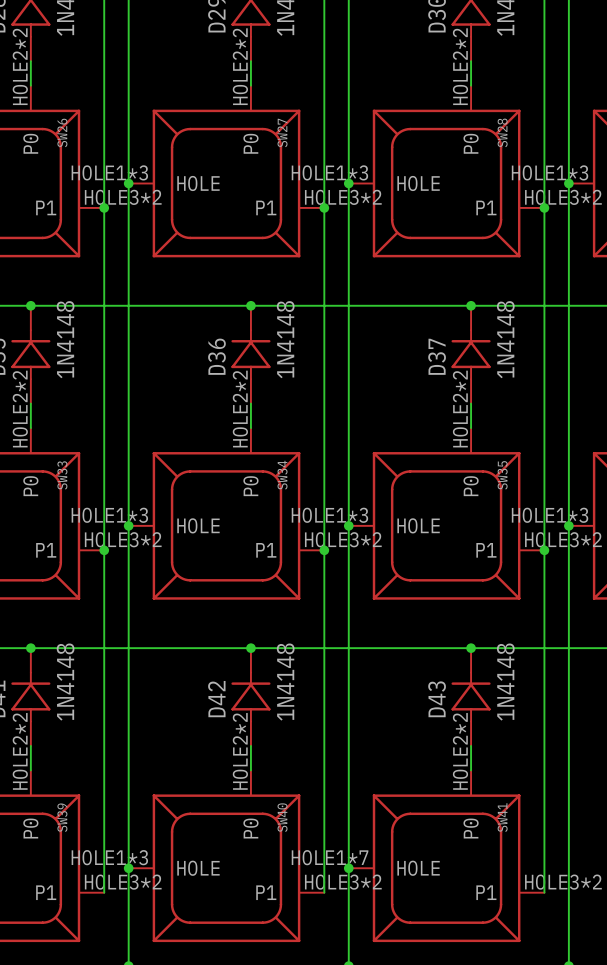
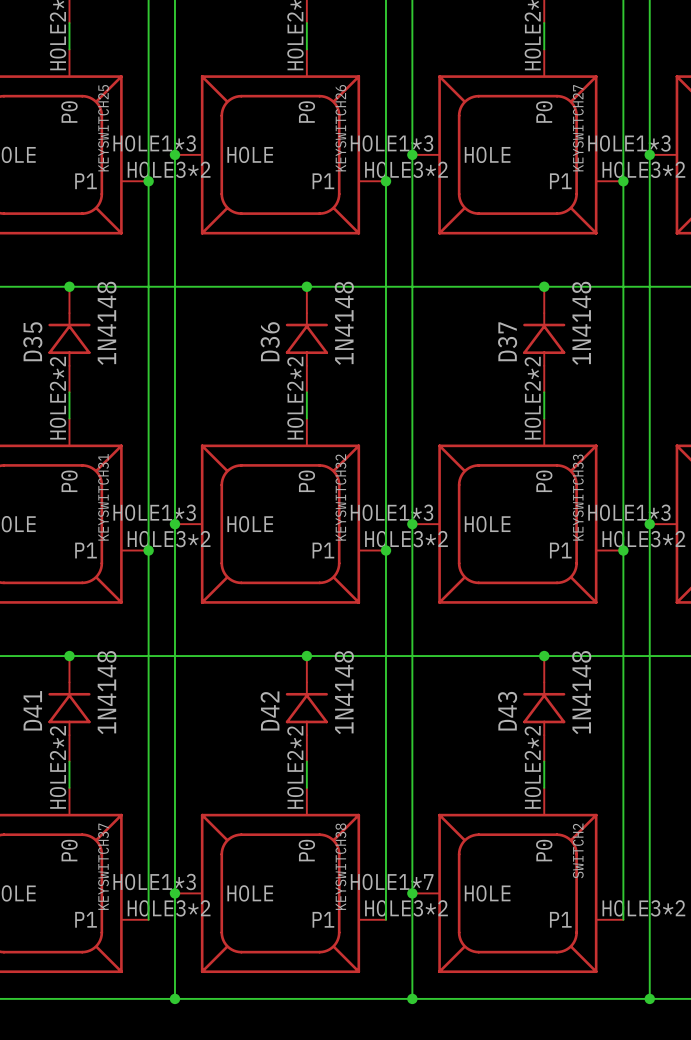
SW26 name: SW26 (62, 132) -> KEYSWITCH25 (103, 128)
SW27 name: SW27 (282, 132) -> KEYSWITCH26 (340, 128)
SW28 name: SW28 (502, 132) -> KEYSWITCH27 (578, 128)
SW33 name: SW33 (62, 475) -> KEYSWITCH31 (103, 497)
SW34 name: SW34 (282, 475) -> KEYSWITCH32 (340, 497)
SW35 name: SW35 (502, 475) -> KEYSWITCH33 (578, 497)
SW39 name: SW39 (62, 817) -> KEYSWITCH37 (103, 866)
SW40 name: SW40 (282, 817) -> KEYSWITCH38 (340, 866)
SW41 name: SW41 (502, 817) -> SWITCH2 (578, 850)

